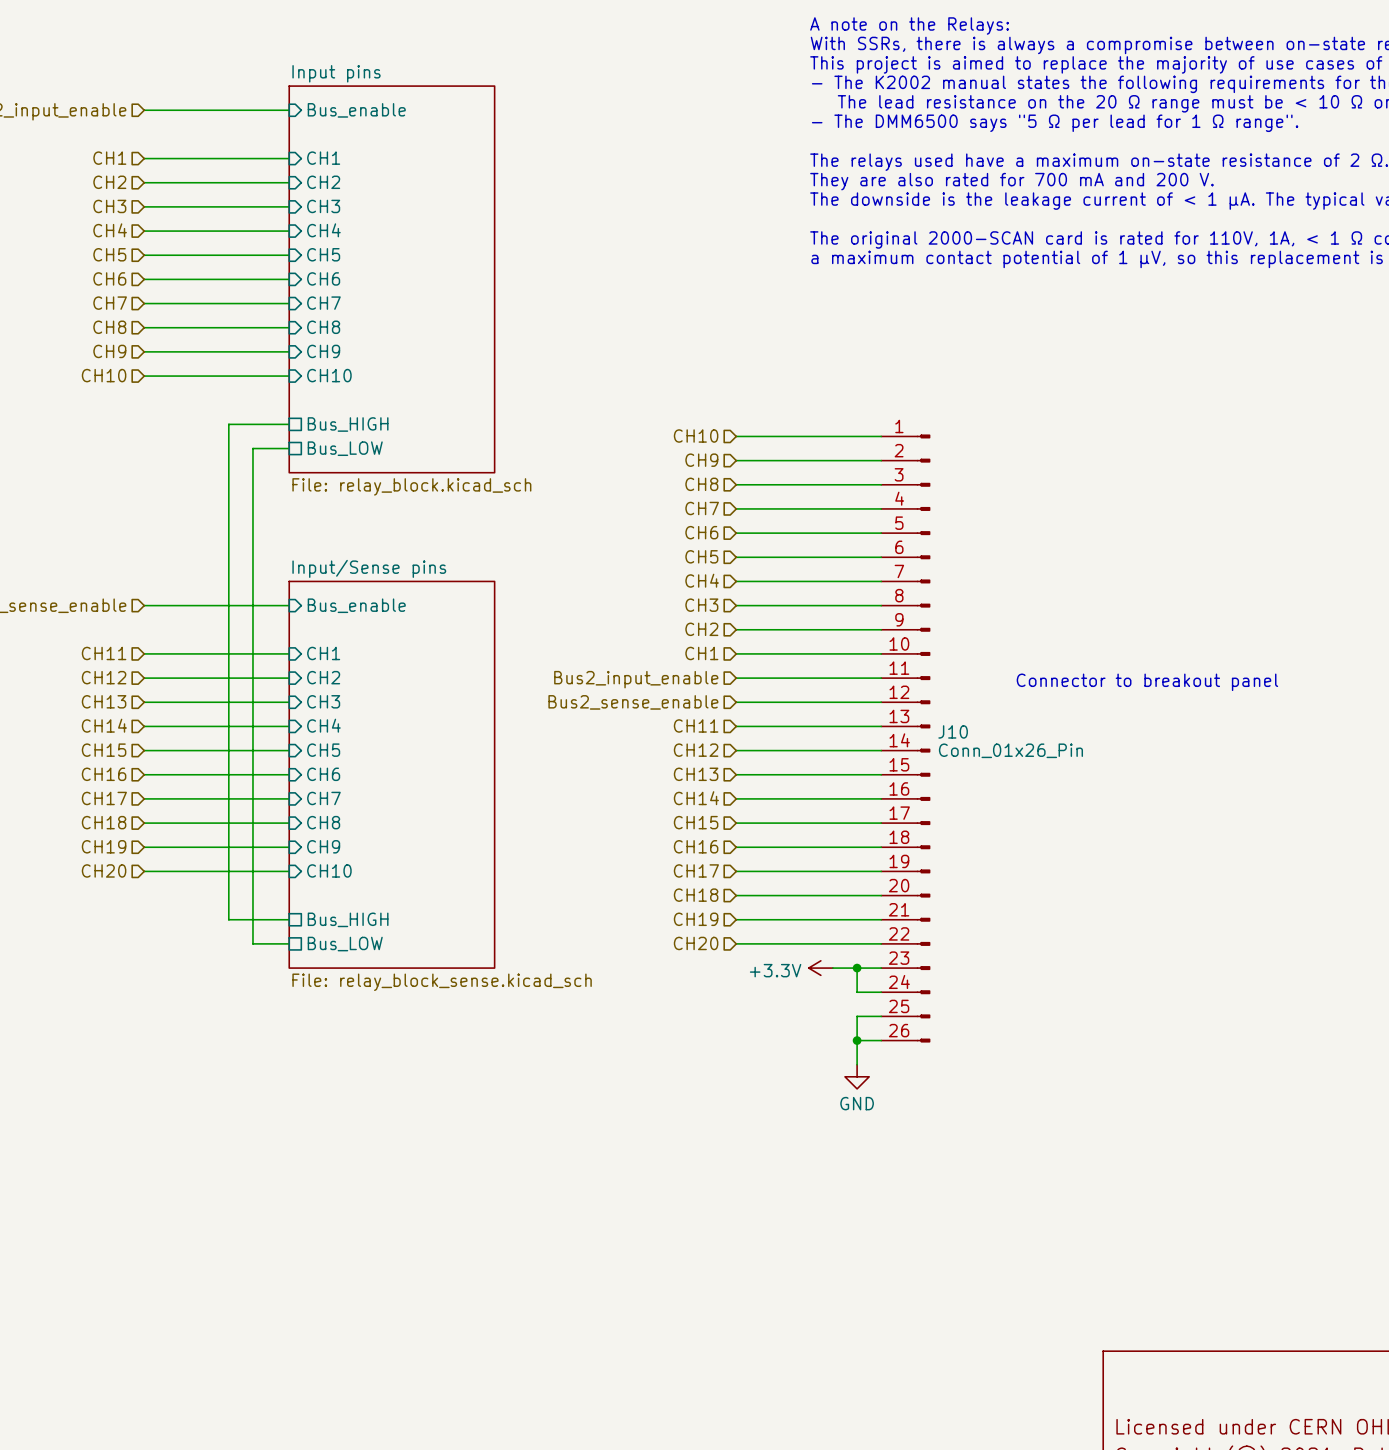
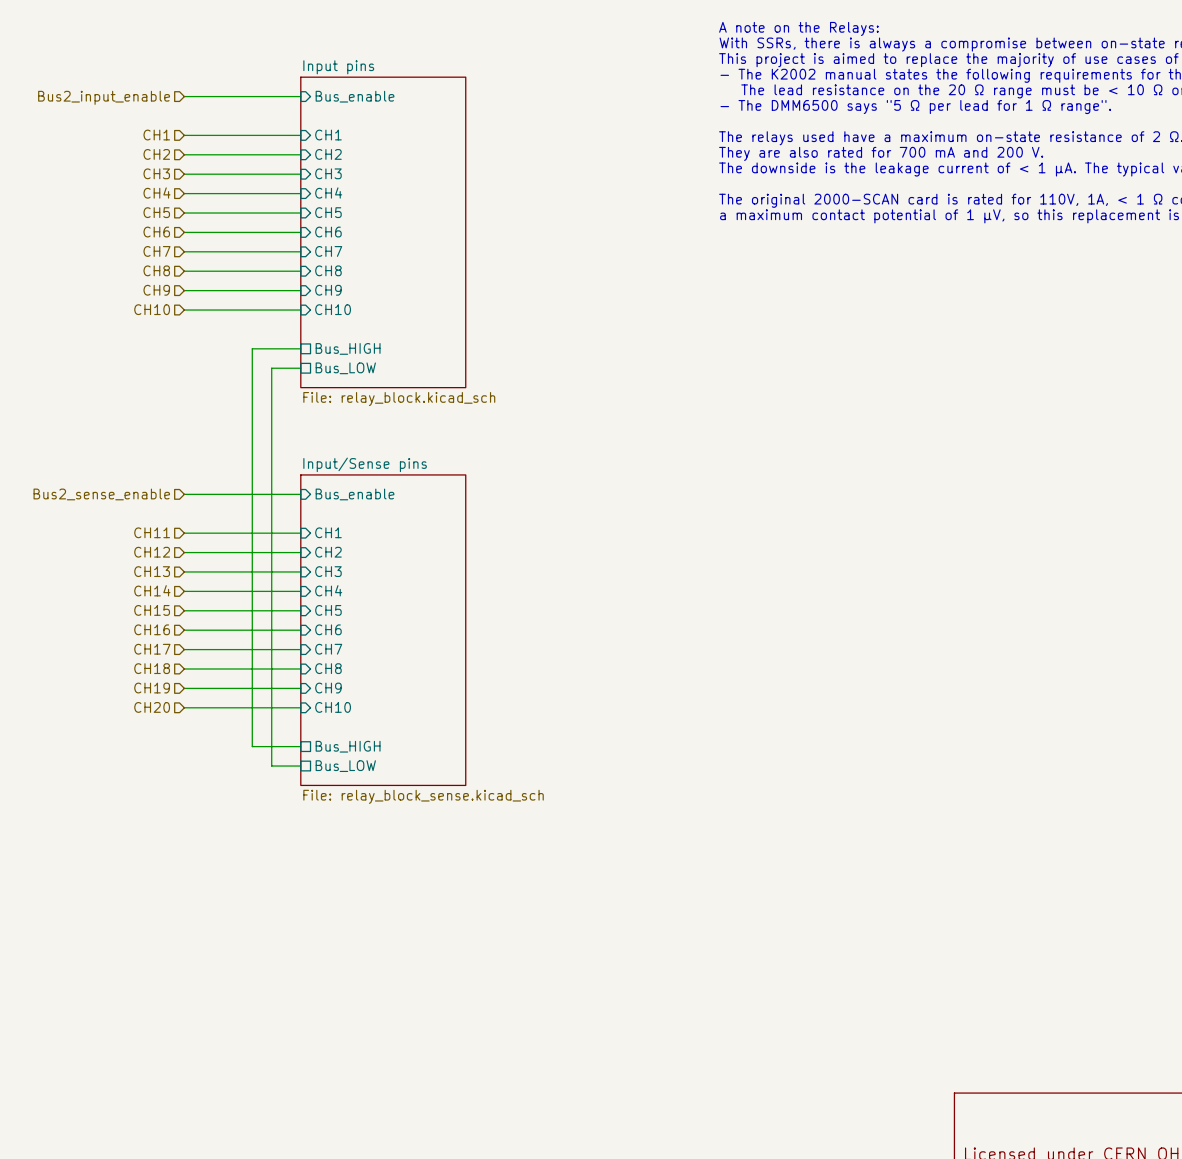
hierarchical label: CH10 (696, 436) -> none
wire: (736, 436) (881, 436) -> none
hierarchical label: CH9 (701, 460) -> none
wire: (736, 460) (881, 460) -> none
hierarchical label: CH8 (701, 484) -> none
wire: (736, 484) (881, 484) -> none
hierarchical label: CH7 (702, 508) -> none
wire: (736, 508) (881, 508) -> none
hierarchical label: CH6 (701, 532) -> none
wire: (736, 533) (881, 533) -> none
hierarchical label: CH5 (701, 556) -> none
wire: (736, 557) (881, 557) -> none
hierarchical label: CH4 (702, 580) -> none
wire: (736, 581) (881, 581) -> none
hierarchical label: CH3 (701, 605) -> none
wire: (736, 605) (881, 605) -> none
hierarchical label: CH2 (701, 629) -> none
wire: (736, 629) (881, 629) -> none
hierarchical label: CH1 (701, 653) -> none
wire: (736, 653) (881, 653) -> none
wire: (736, 678) (881, 678) -> none
hierarchical label: Bus2_input_enable (636, 679) -> none
text: Connector to breakout panel (1147, 682) -> none
hierarchical label: Bus2_sense_enable (633, 702) -> none
wire: (736, 702) (881, 702) -> none
hierarchical label: CH11 (696, 725) -> none
wire: (736, 726) (881, 726) -> none
J10: Conn_01x26_Pin (905, 738) -> none
hierarchical label: CH12 (696, 750) -> none
wire: (736, 750) (881, 750) -> none
hierarchical label: CH13 (696, 774) -> none
wire: (736, 774) (881, 774) -> none
hierarchical label: CH14 (696, 798) -> none
wire: (736, 798) (881, 798) -> none
hierarchical label: CH15 (696, 822) -> none
wire: (736, 823) (881, 823) -> none
hierarchical label: CH16 (696, 846) -> none
wire: (736, 847) (881, 847) -> none
hierarchical label: CH17 (696, 870) -> none
wire: (736, 871) (881, 871) -> none
hierarchical label: CH18 (696, 895) -> none
wire: (736, 895) (881, 895) -> none
hierarchical label: CH19 (696, 919) -> none
wire: (736, 919) (881, 919) -> none
hierarchical label: CH20 (696, 943) -> none
wire: (736, 943) (881, 943) -> none
power symbol: +3.3V (820, 968) -> none
wire: (832, 968) (881, 968) -> none
wire: (857, 968) (857, 992) (881, 992) -> none
junction: (857, 968) -> none
wire: (881, 1016) (857, 1016) (857, 1064) -> none
wire: (857, 1040) (881, 1040) -> none
junction: (857, 1040) -> none
power symbol: GND (857, 1076) -> none

